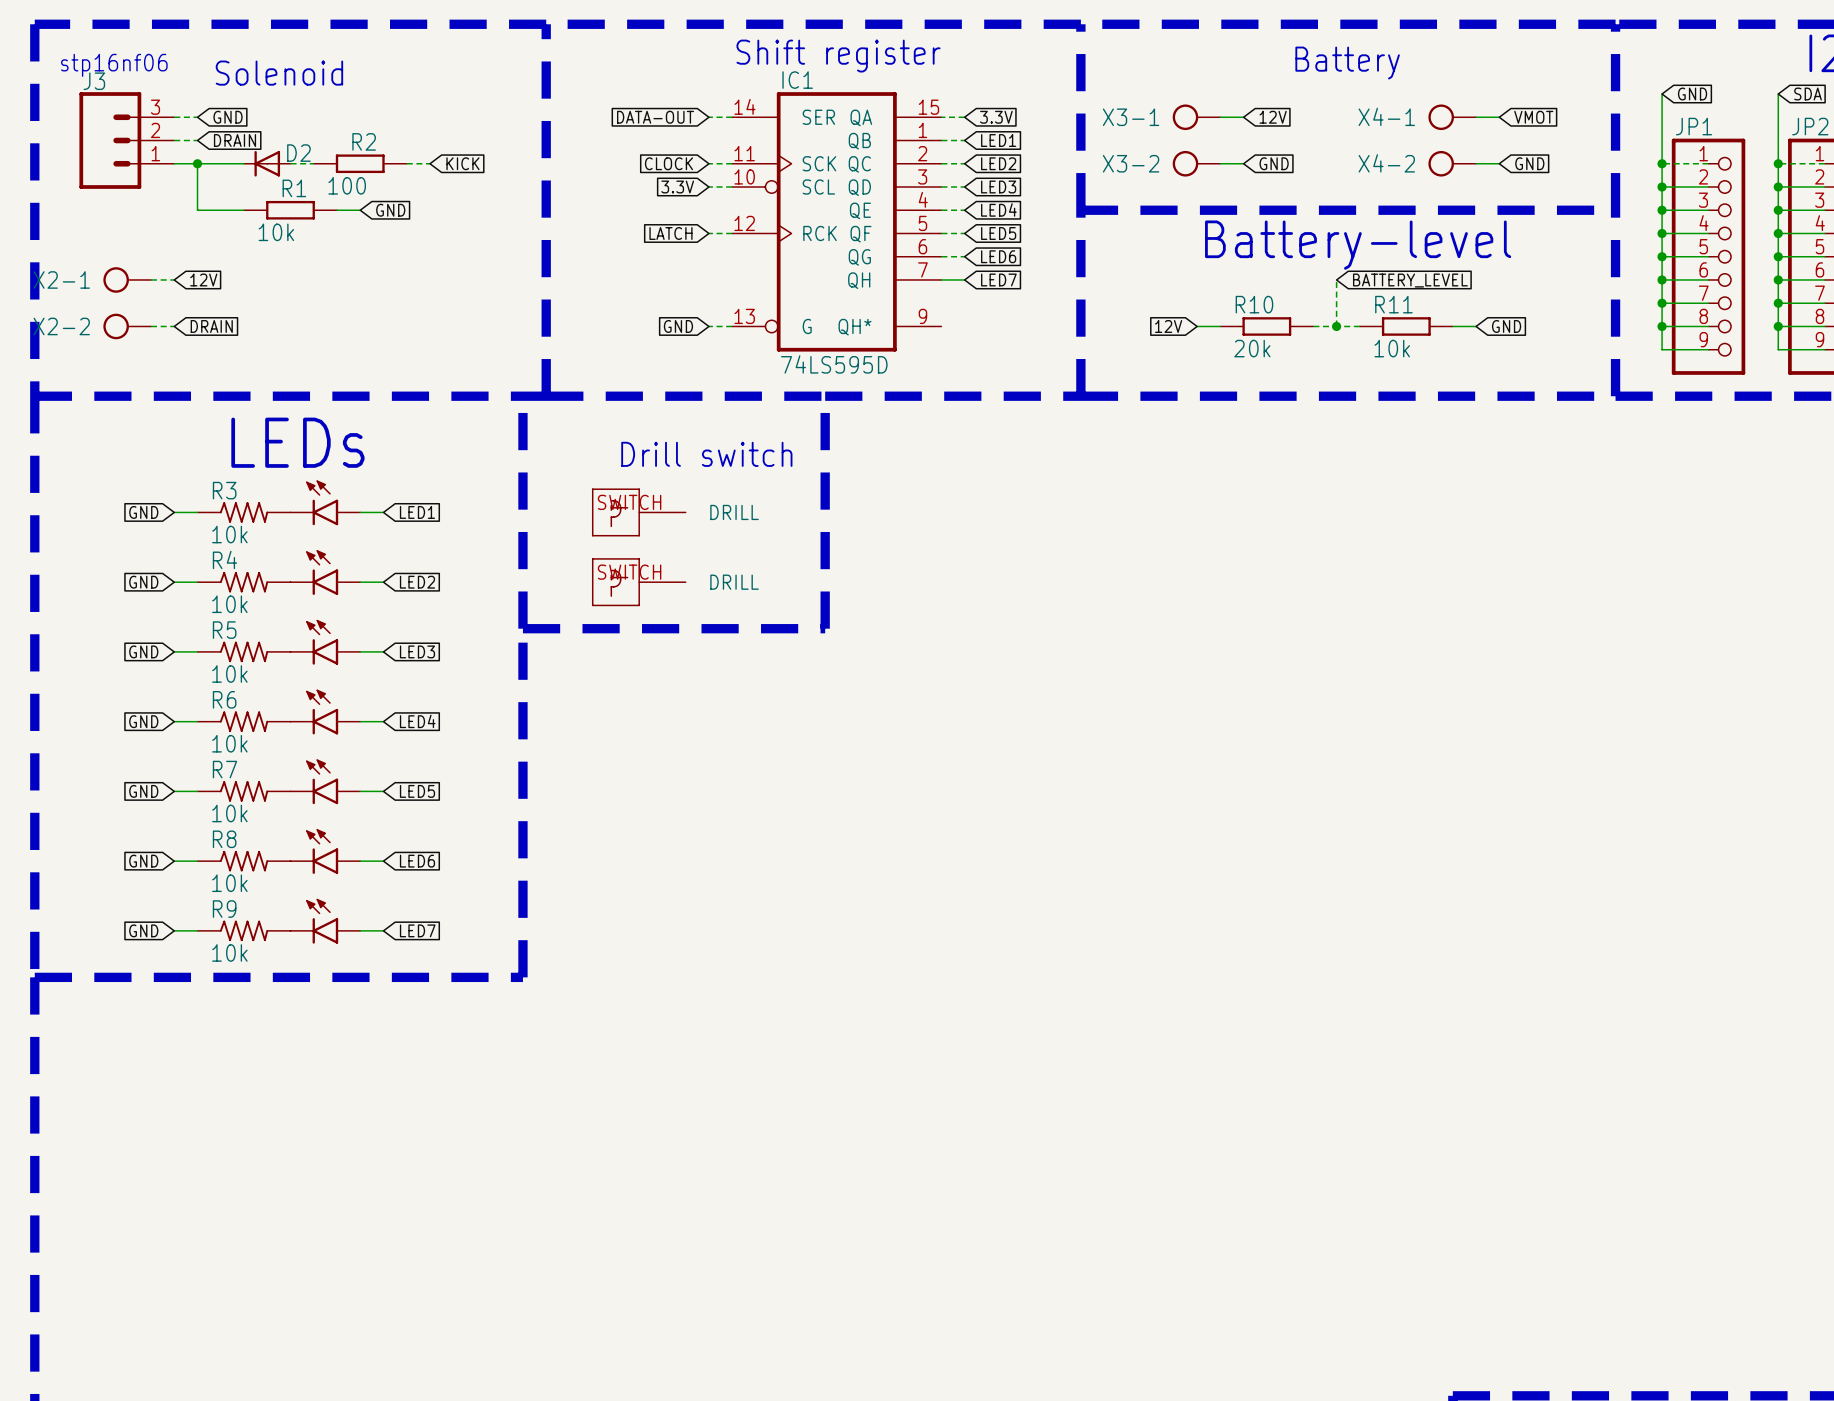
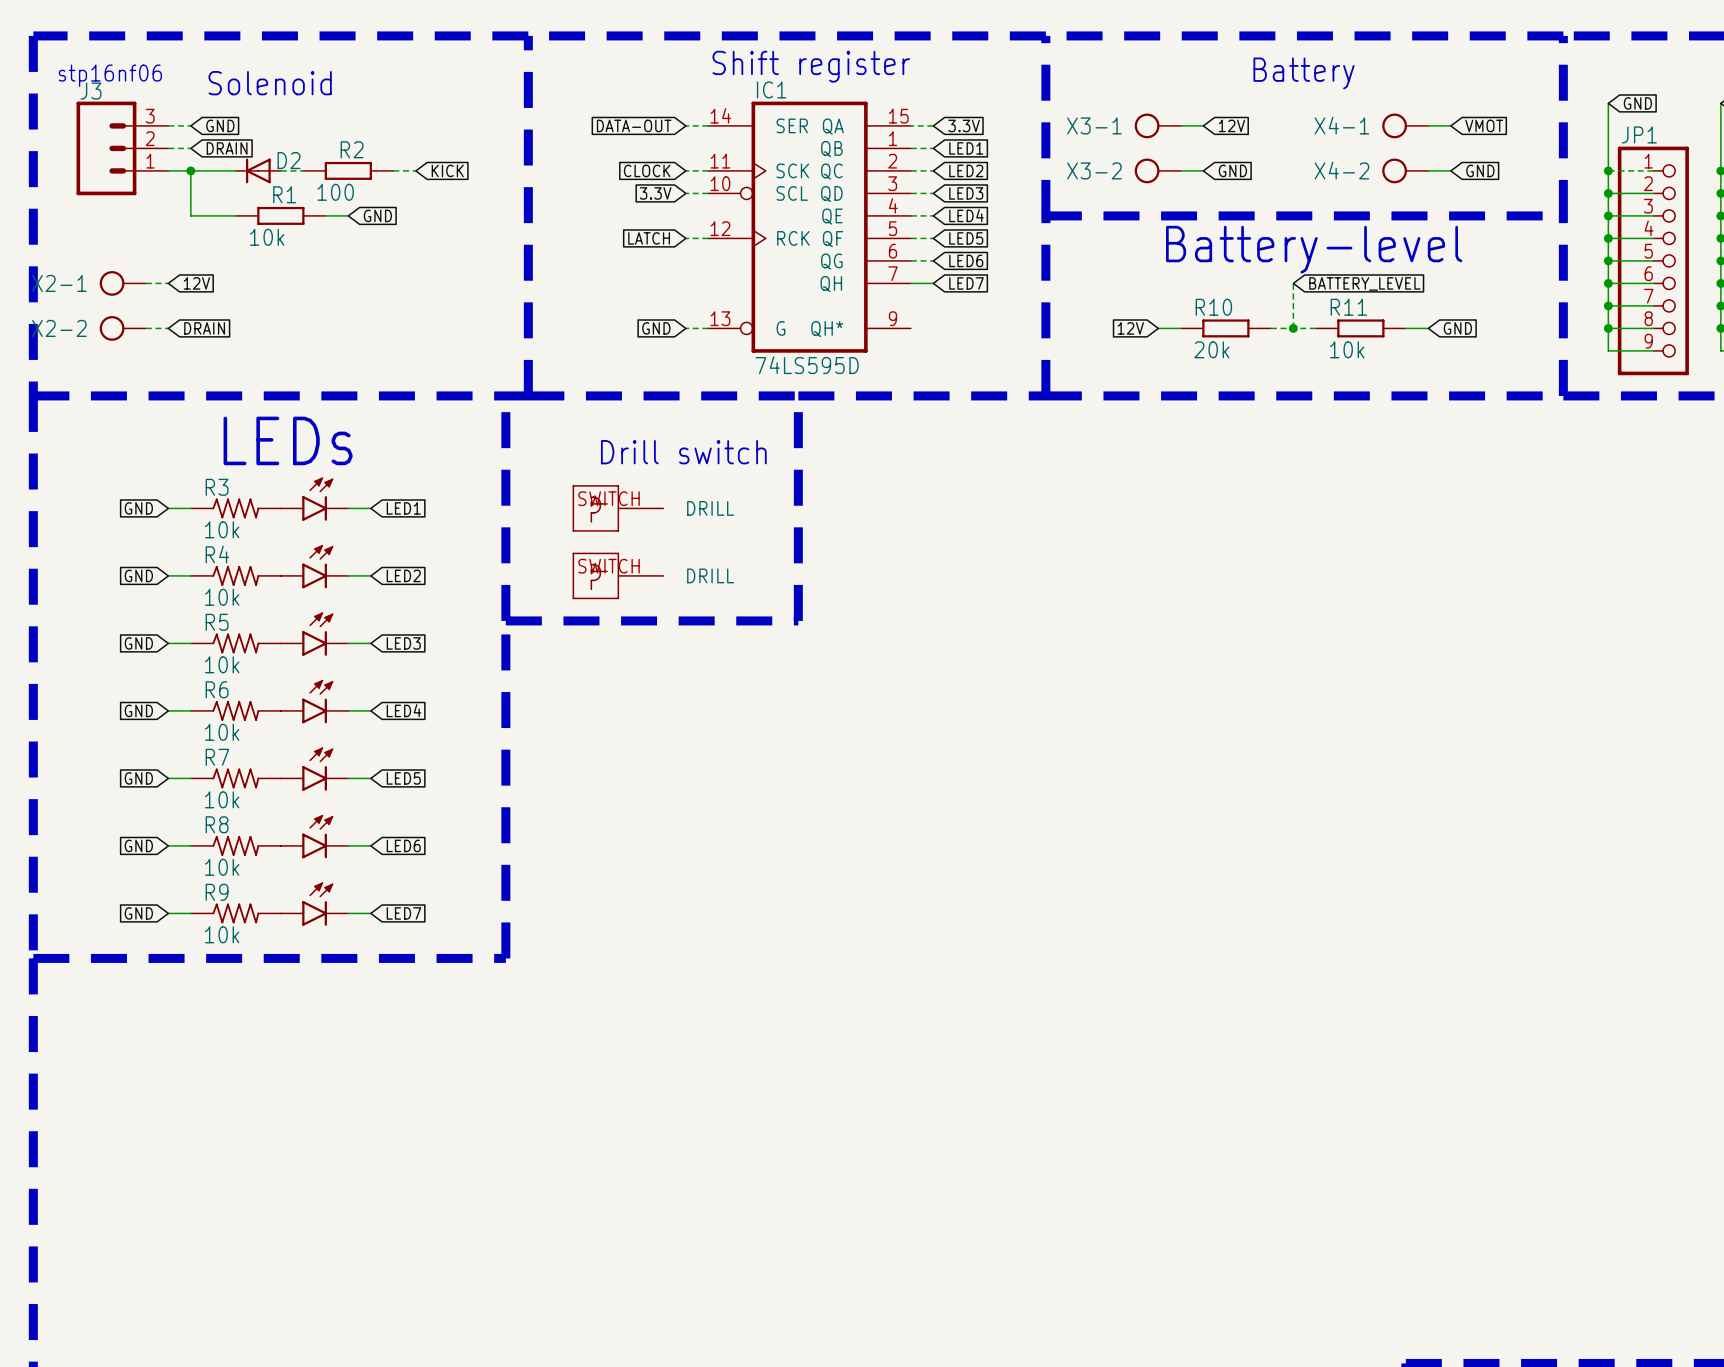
part flip: as is (322, 502) -> left-right (317, 499)
part flip: as is (322, 572) -> left-right (317, 566)
part flip: as is (322, 642) -> left-right (317, 634)
part flip: as is (322, 712) -> left-right (317, 701)
part flip: as is (322, 781) -> left-right (317, 769)
part flip: as is (322, 851) -> left-right (317, 836)
part flip: as is (322, 921) -> left-right (317, 904)

